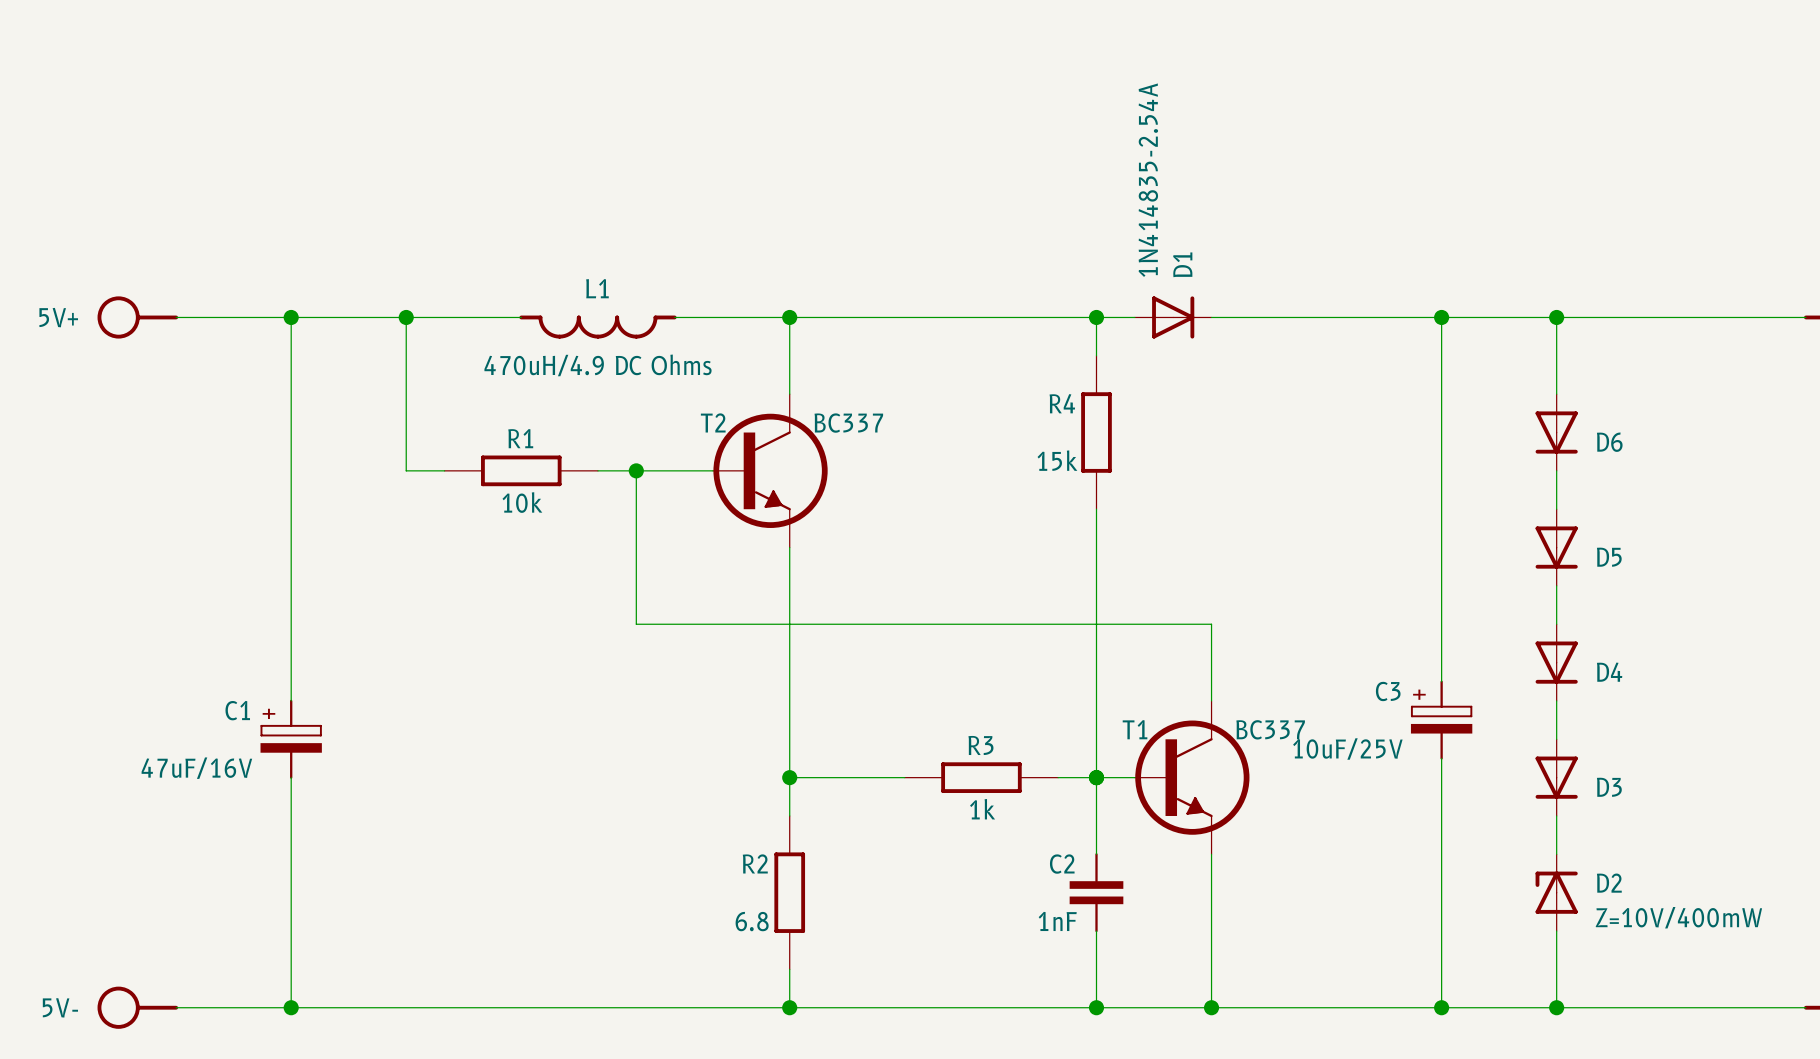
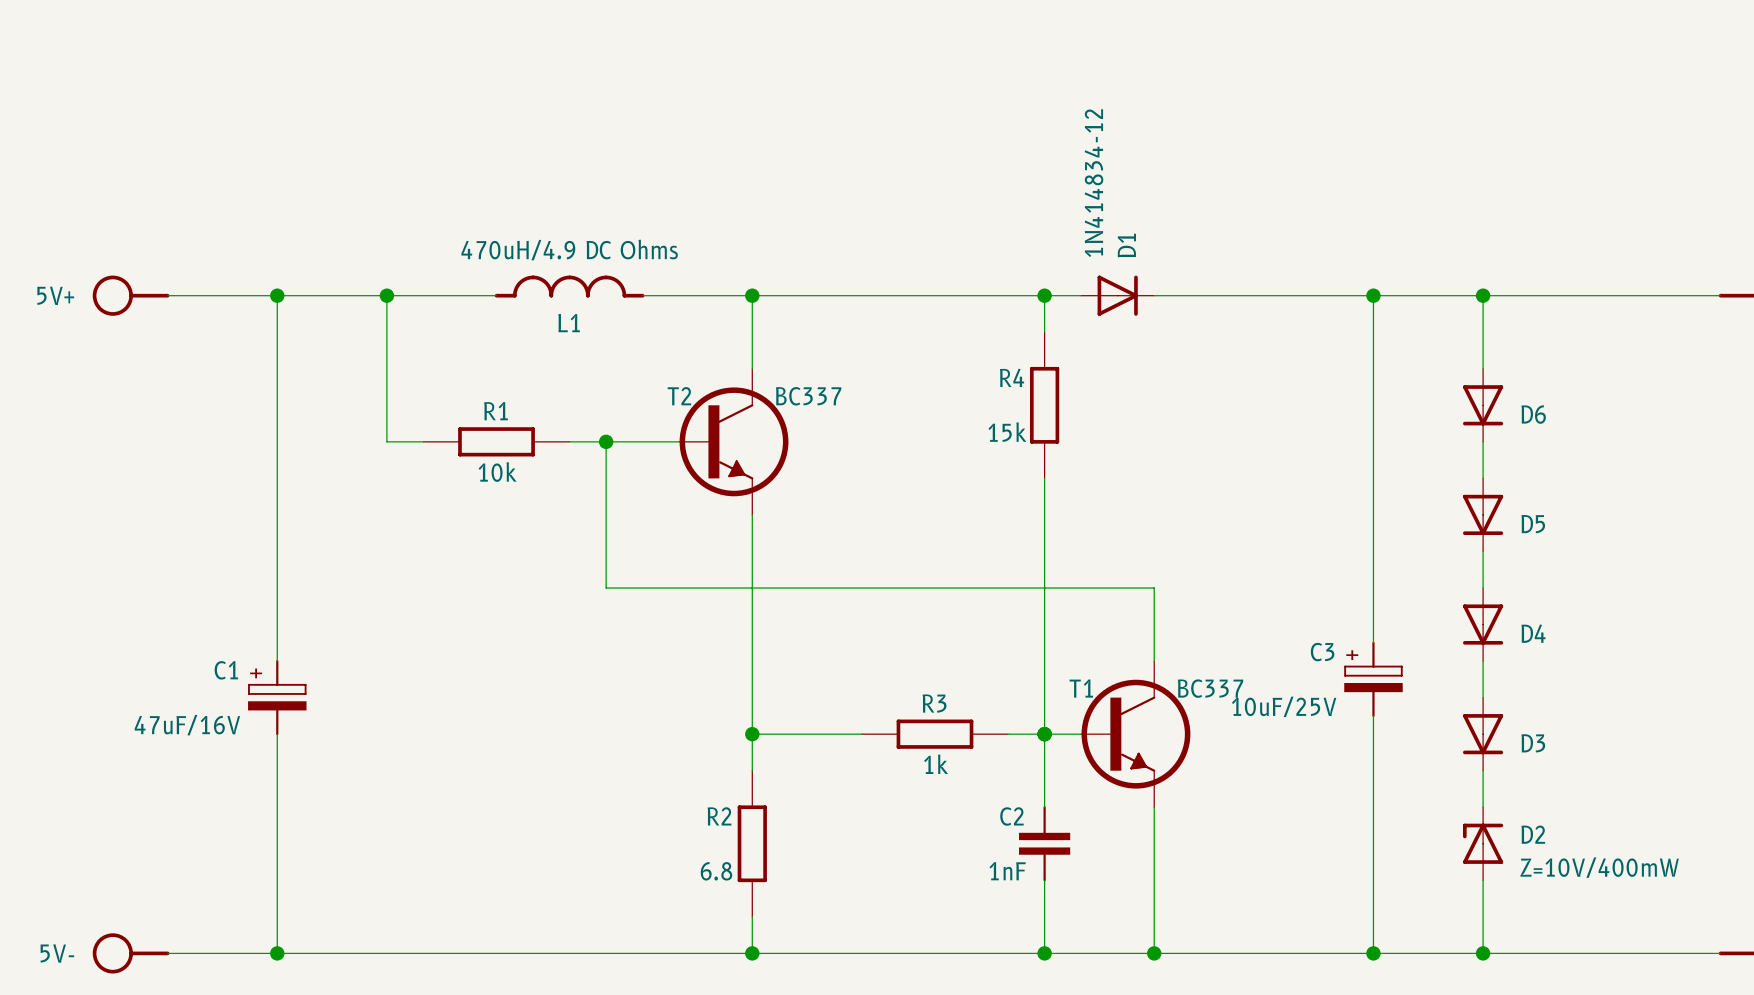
D1 value: 1N414835-2.54A (1148, 180) -> 1N414834-12 (1094, 183)
L1 rotation: 0° (597, 327) -> 180° (569, 286)

